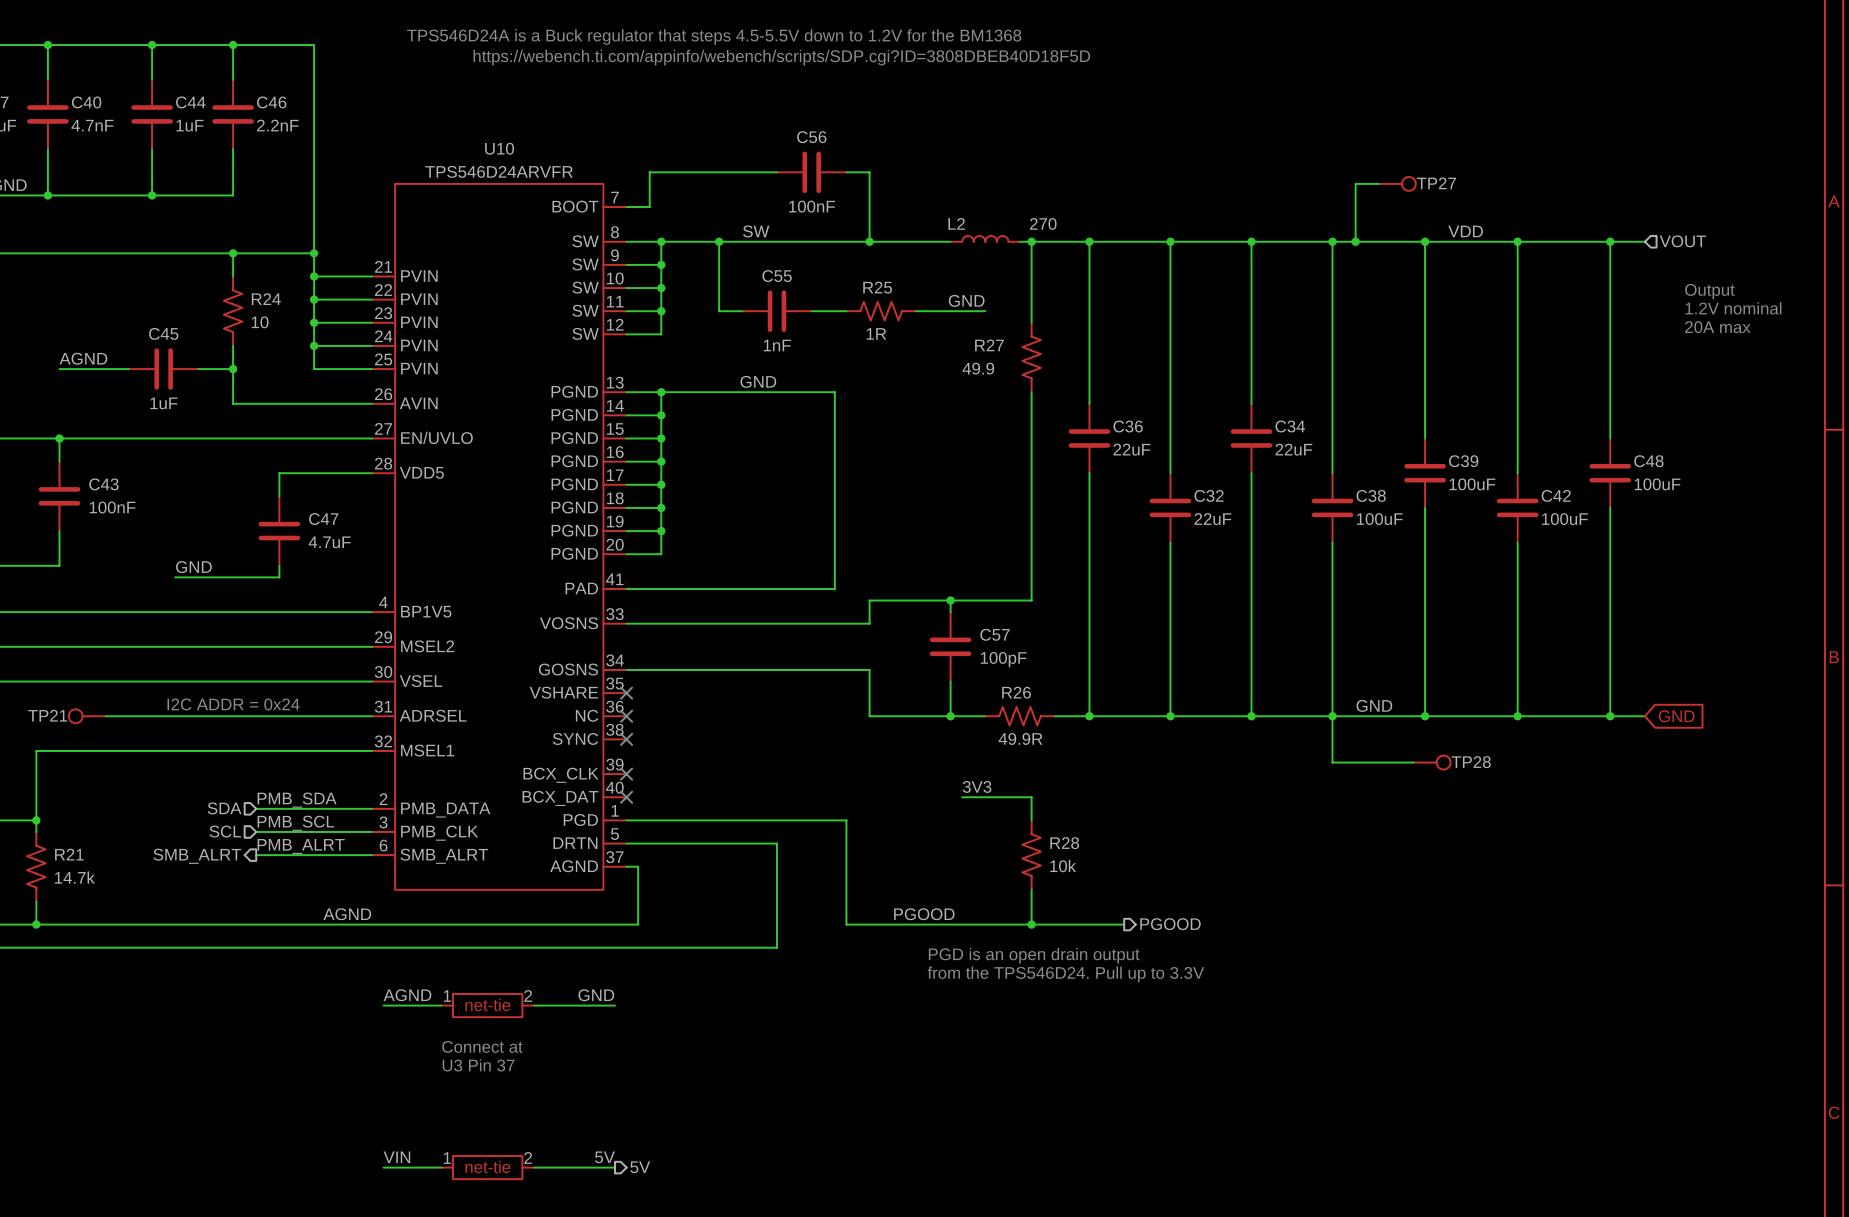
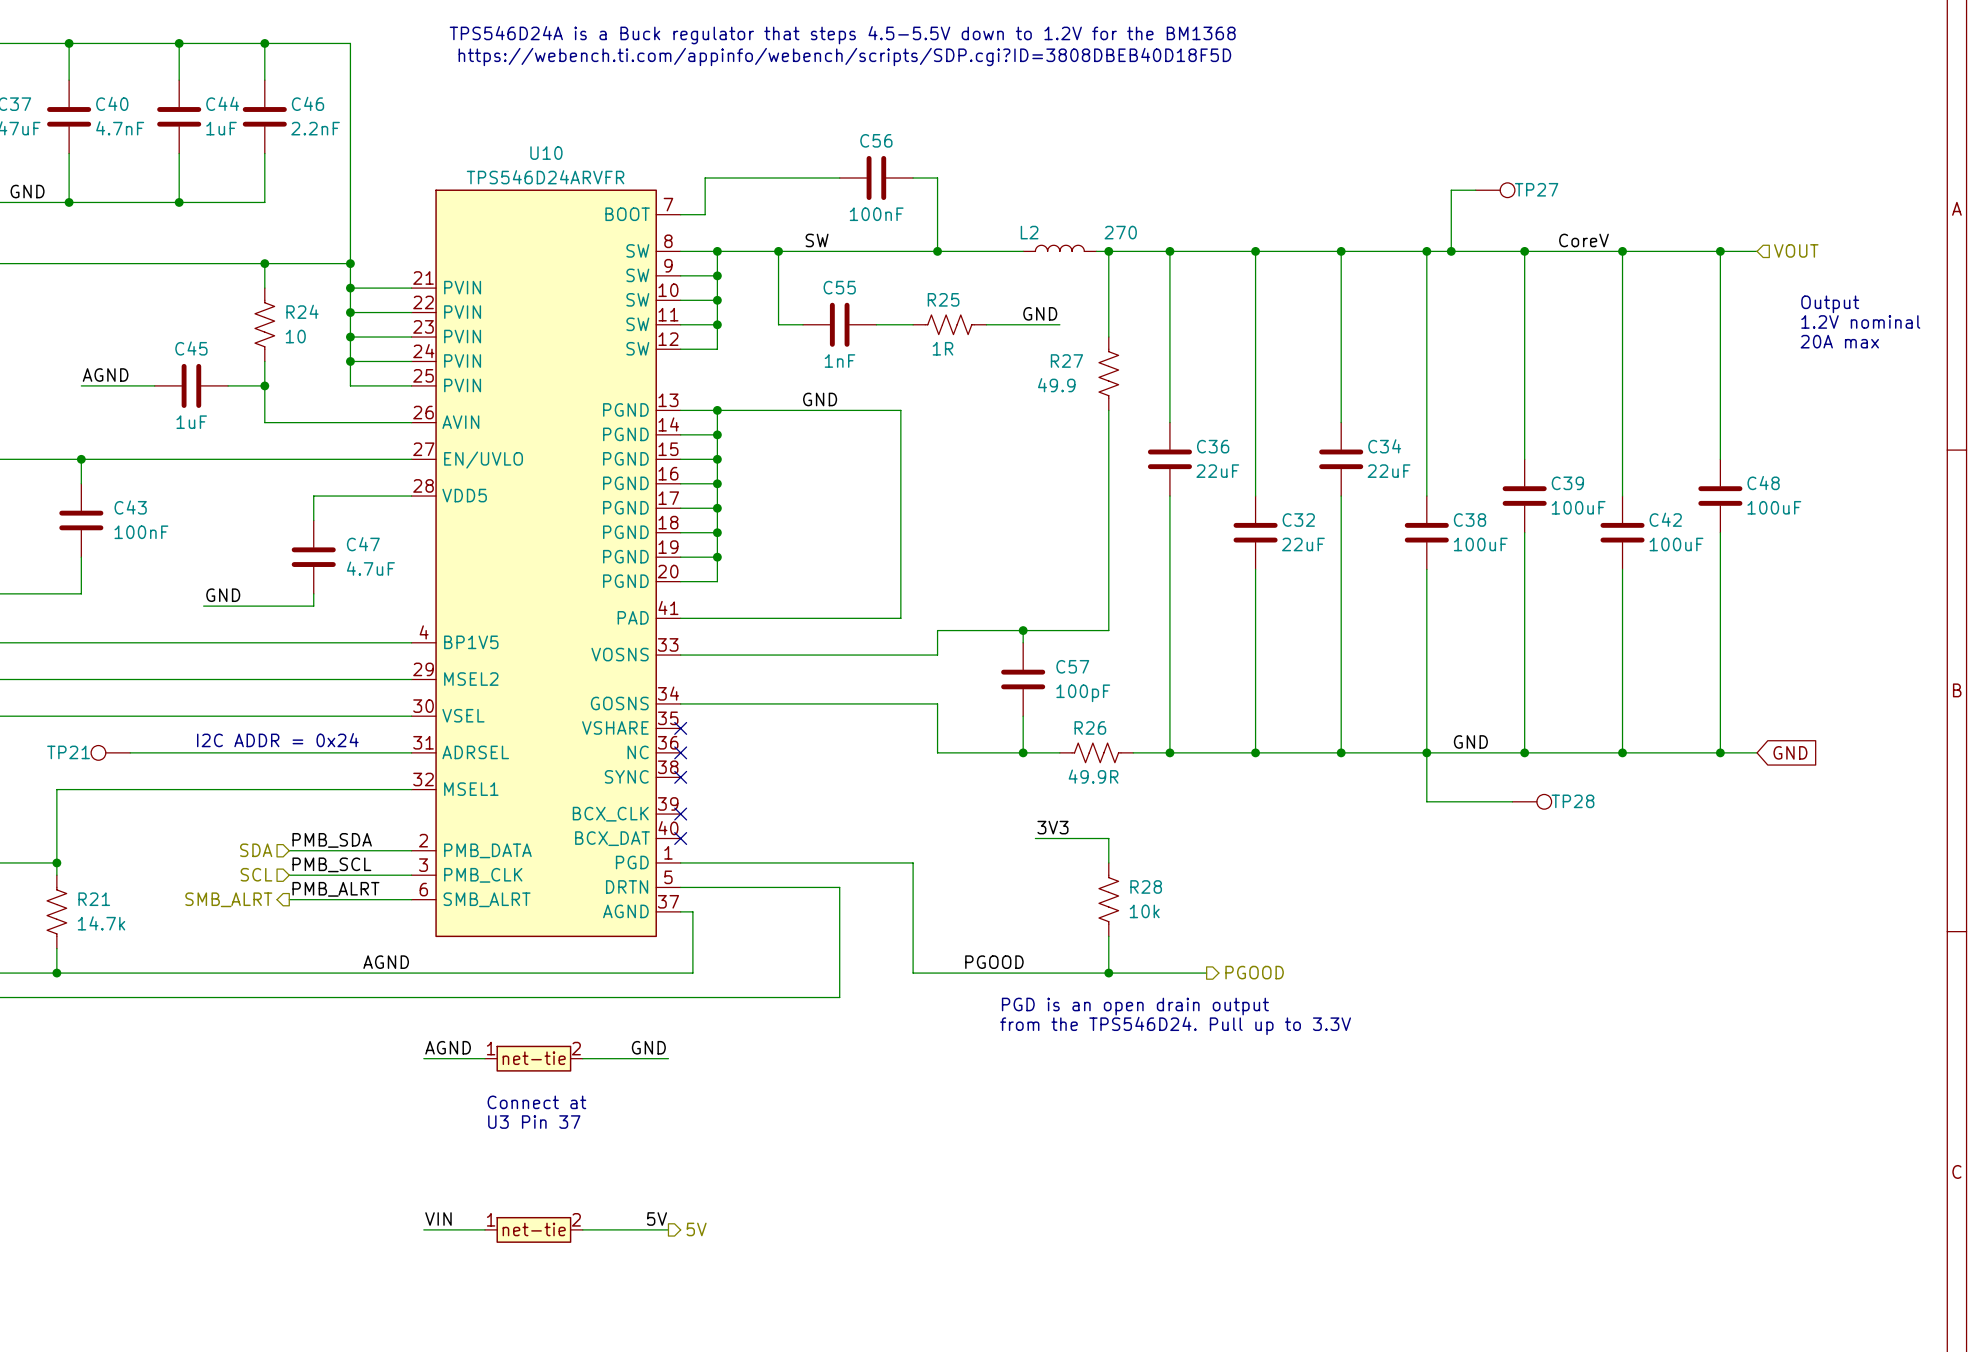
label: VDD (1465, 231) -> none
label: none -> CoreV (1583, 240)

